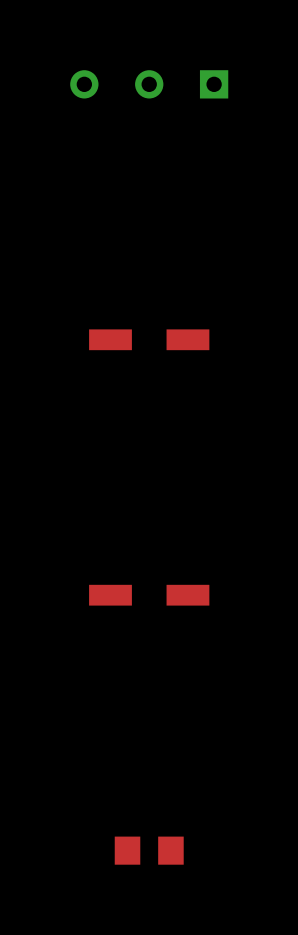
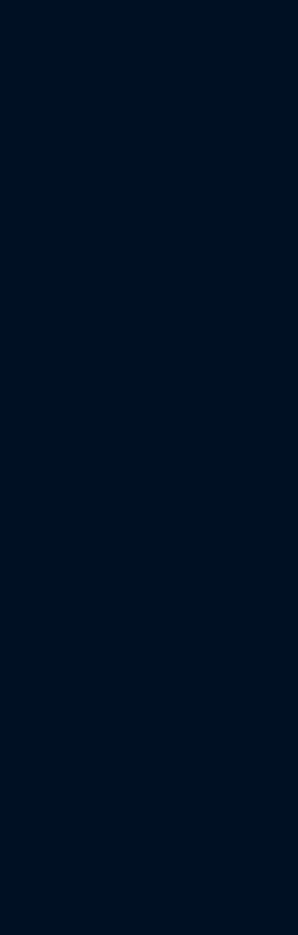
part: (149, 84) -> none
part: (149, 339) -> none
part: (149, 595) -> none
part: (149, 850) -> none

